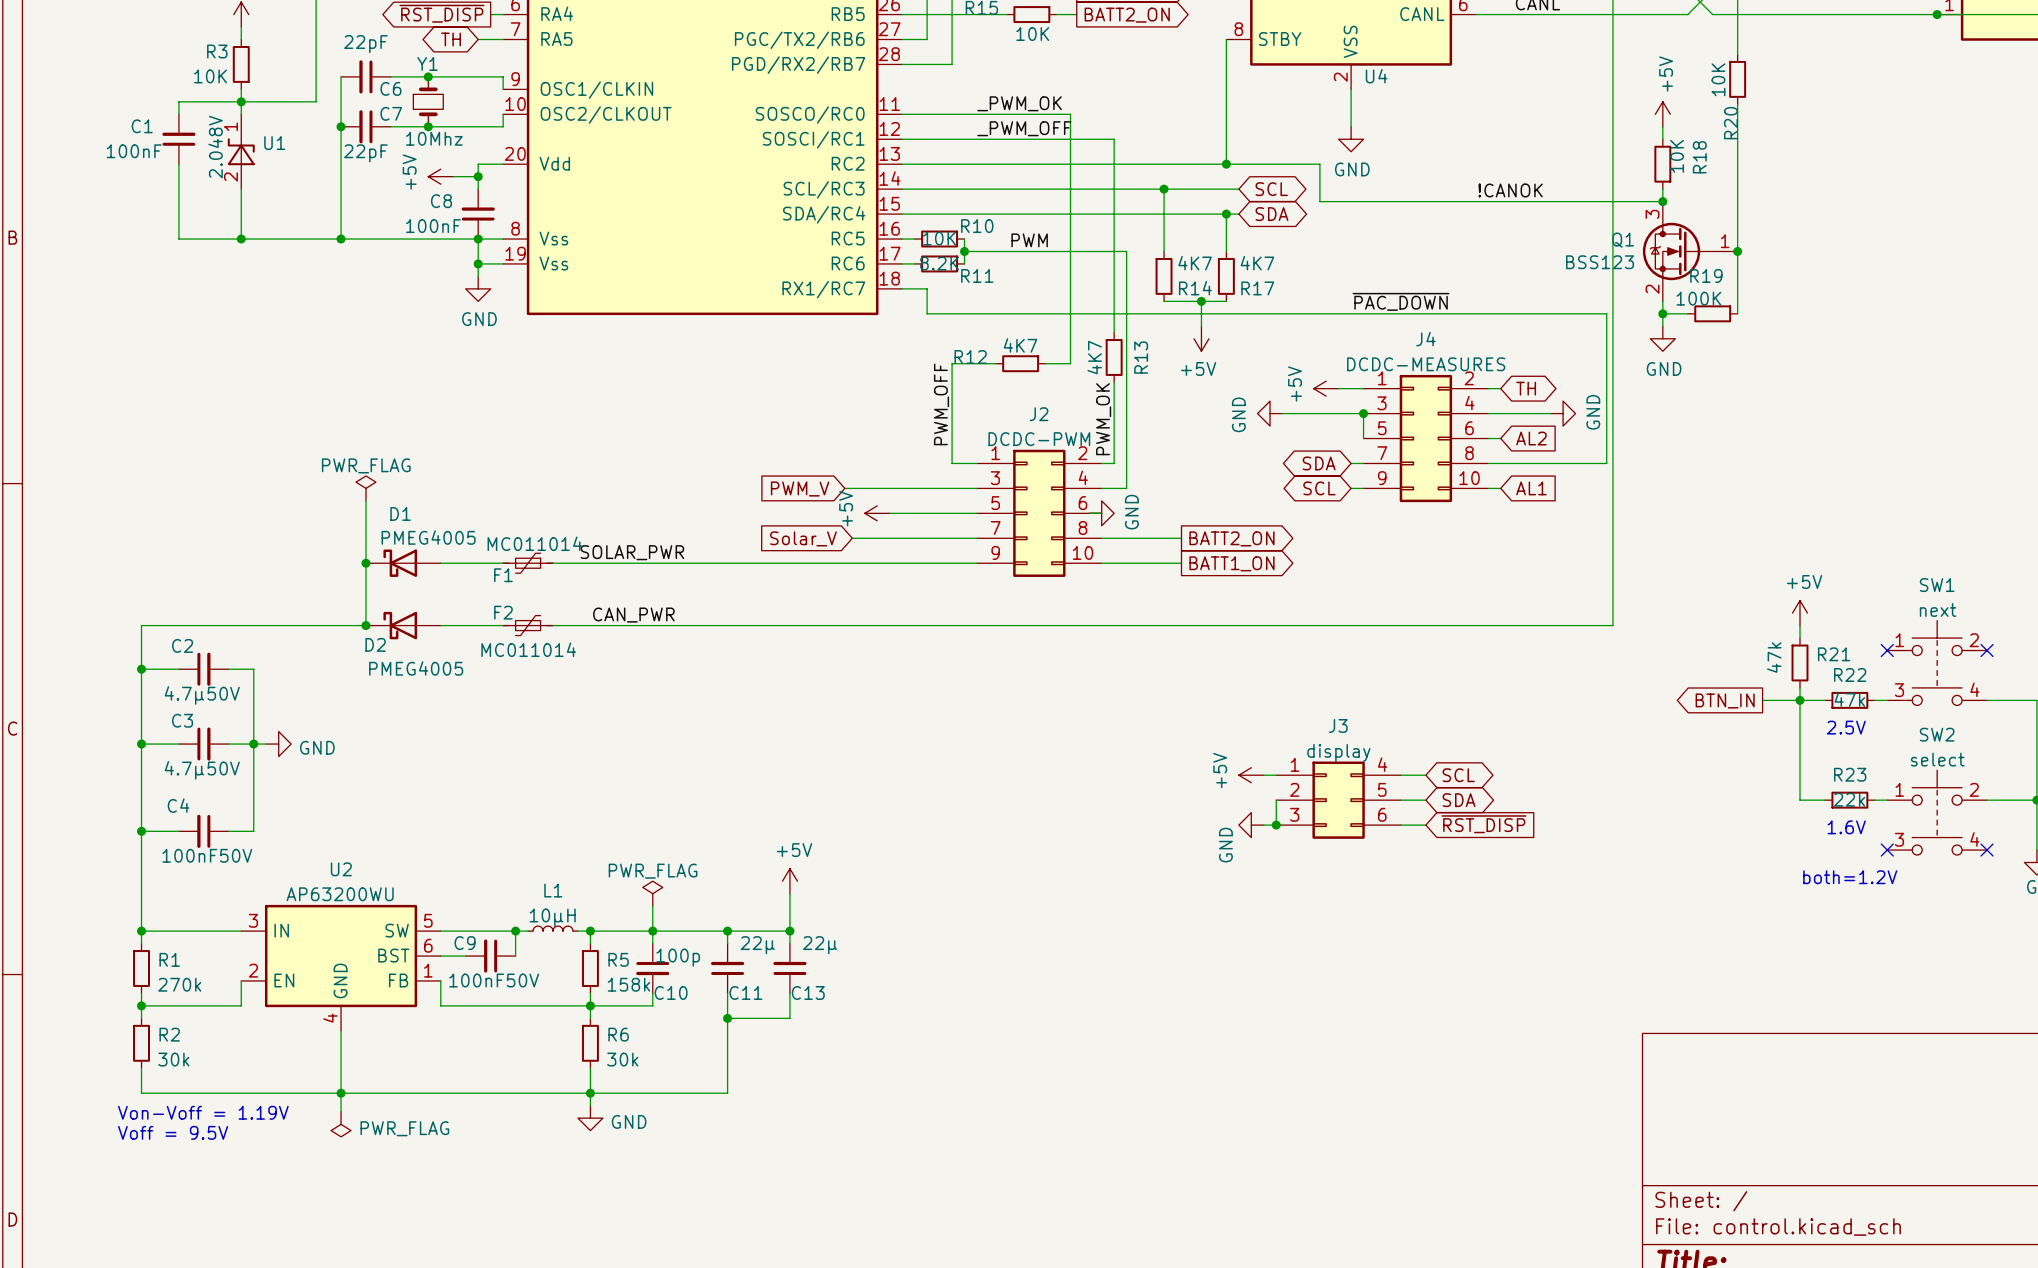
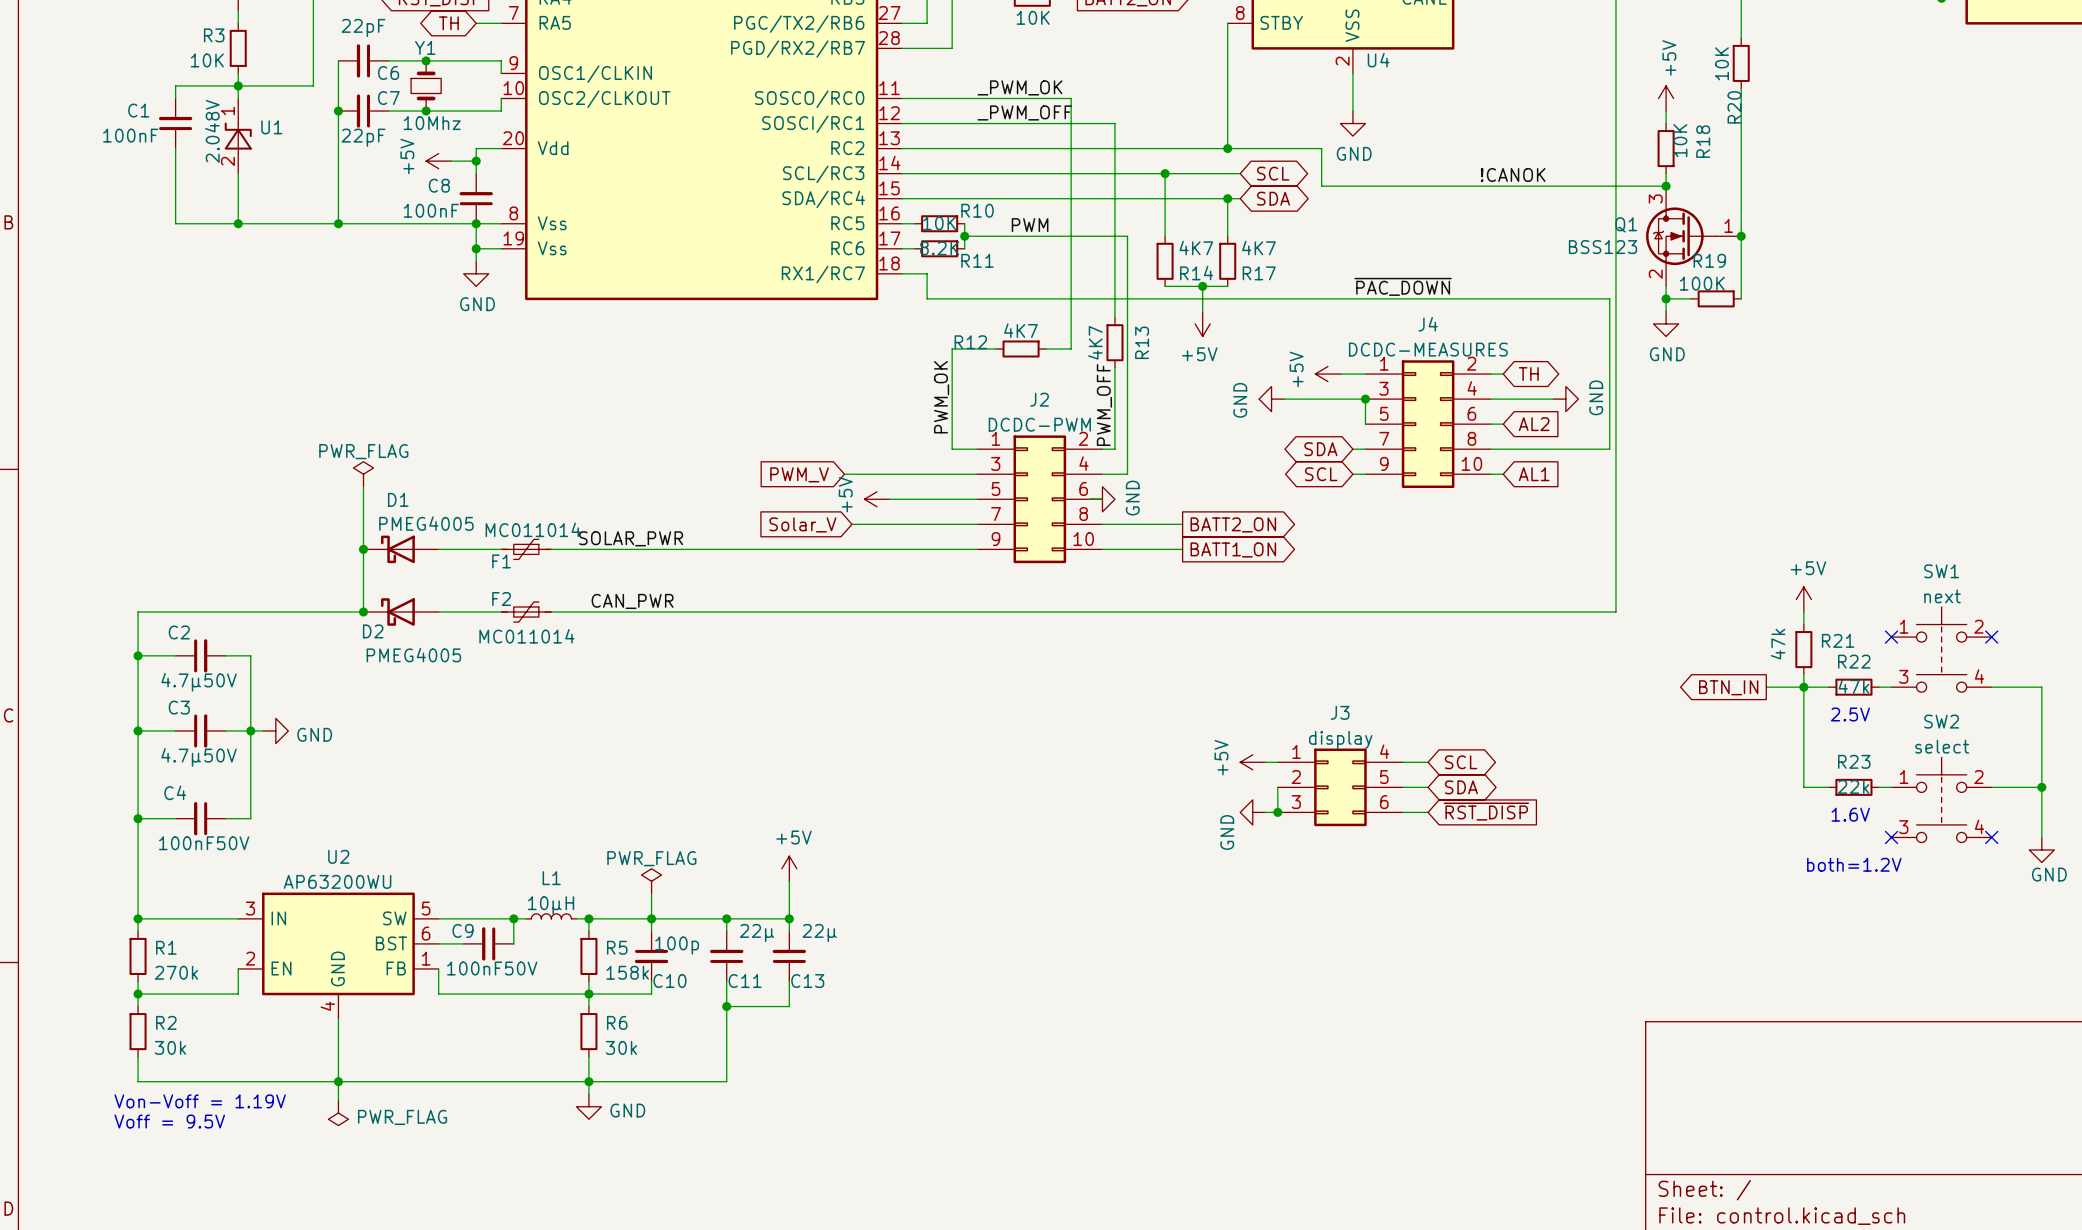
label: PWM_OFF (941, 404) -> PWM_OK (941, 397)
label: PWM_OK (1103, 419) -> PWM_OFF (1104, 404)

